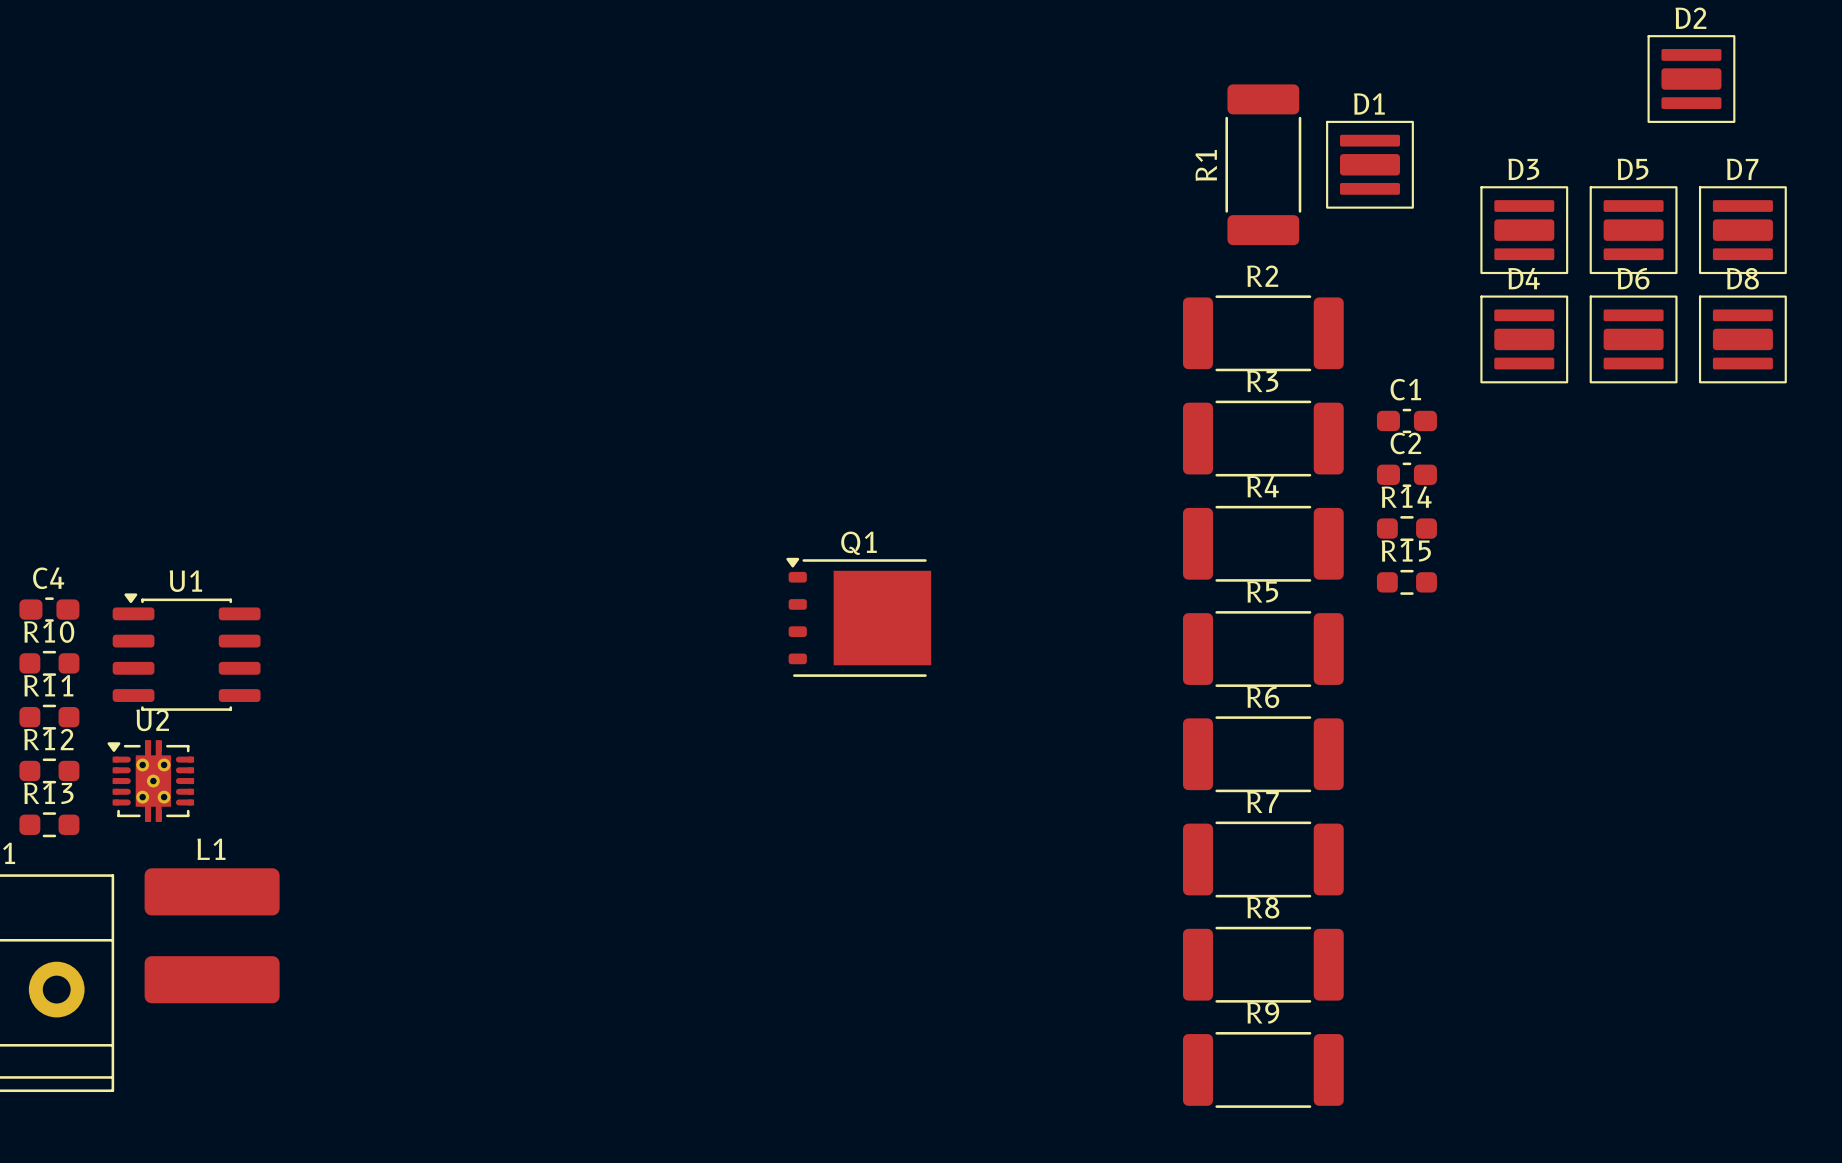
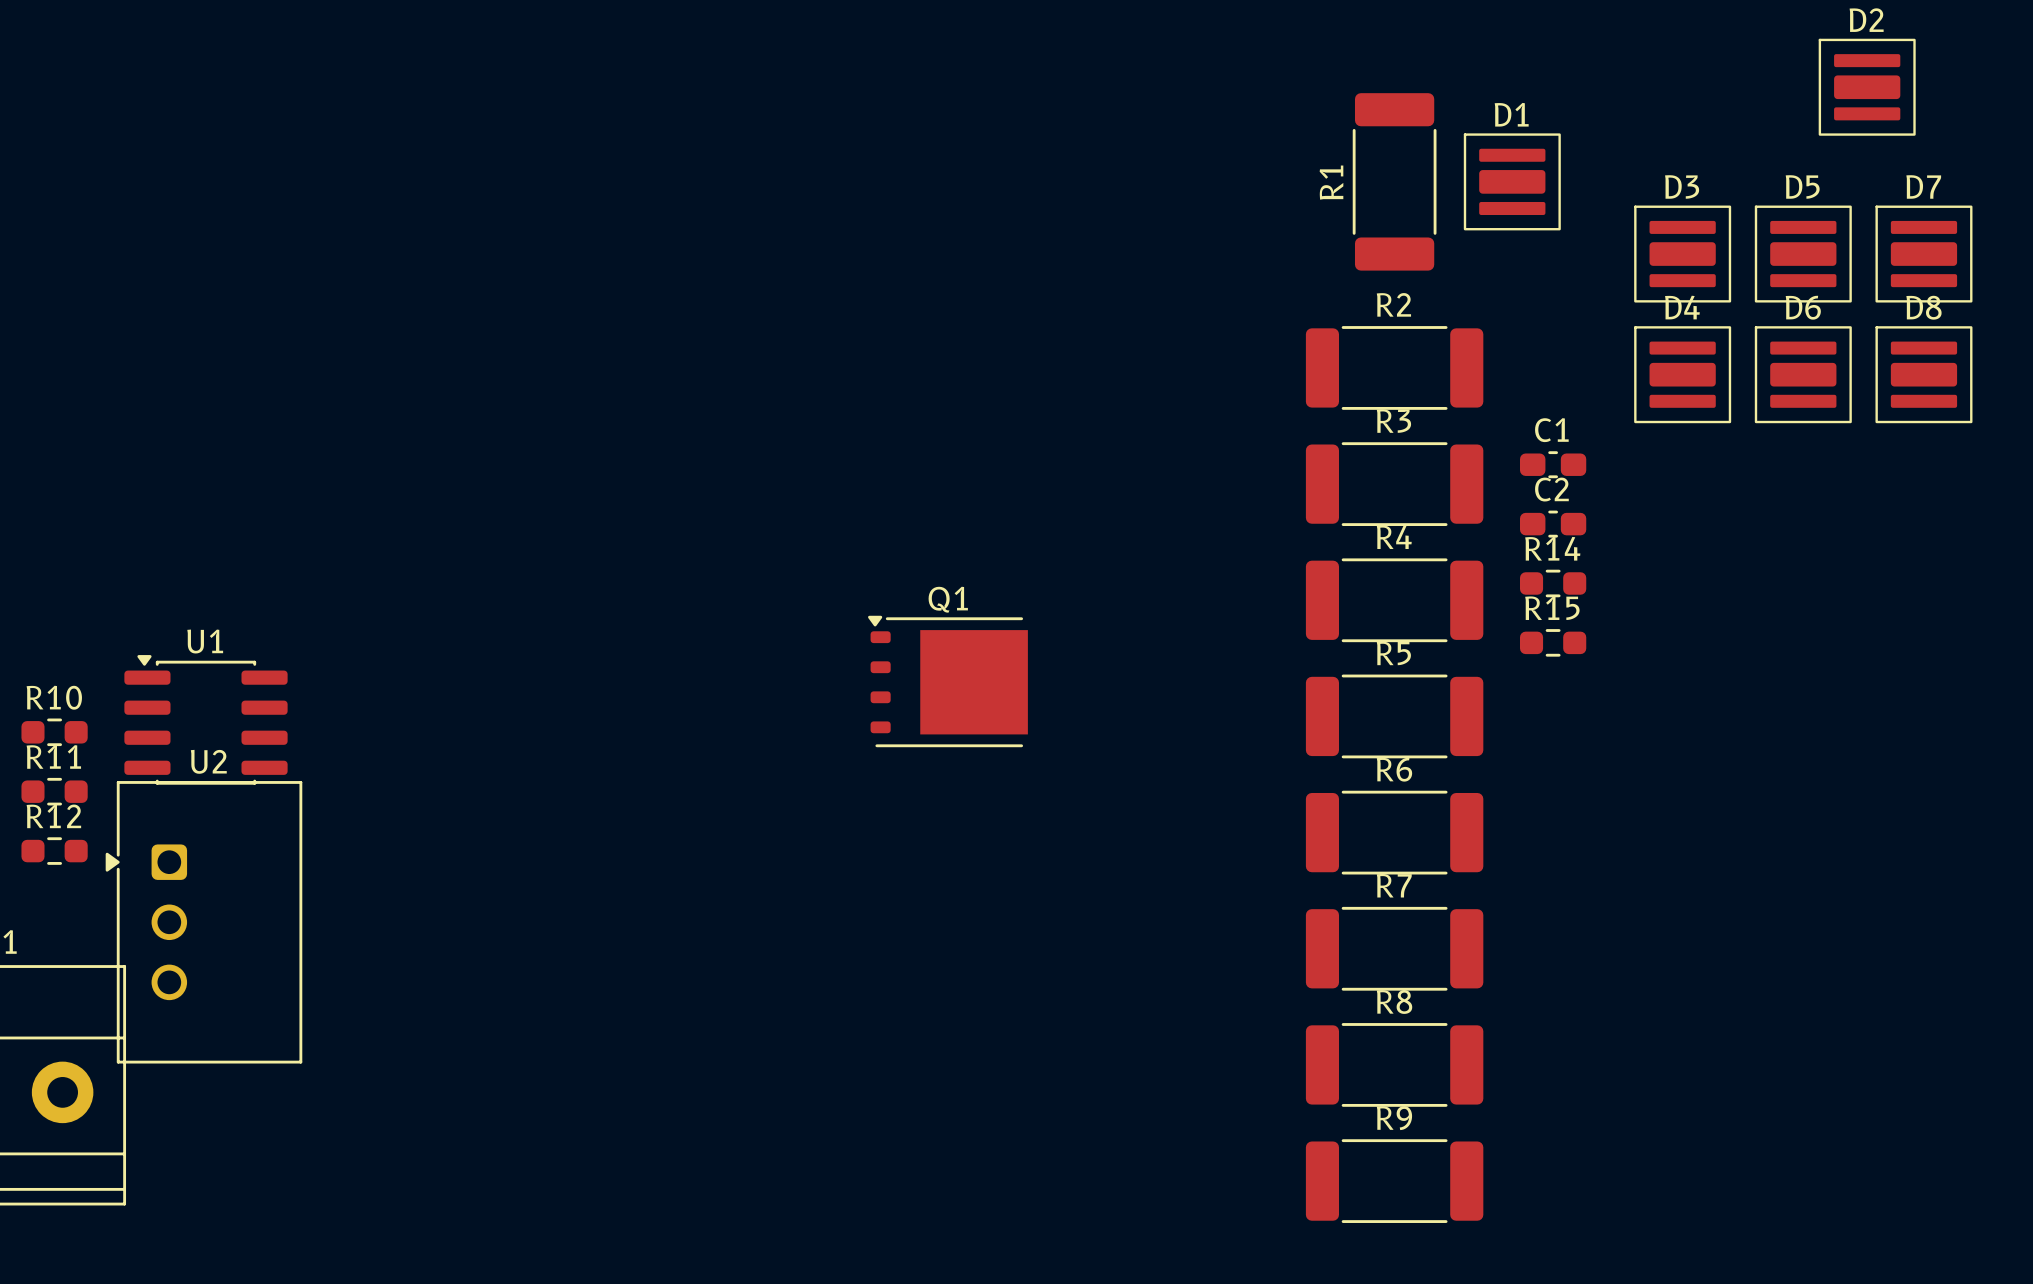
C4: (49, 609) -> none
U2 name position: U2 (152, 720) -> U2 (208, 761)
U2 footprint: [107, 740, 195, 822] -> [105, 781, 303, 1064]
R13: (49, 824) -> none
L1: (212, 935) -> none

